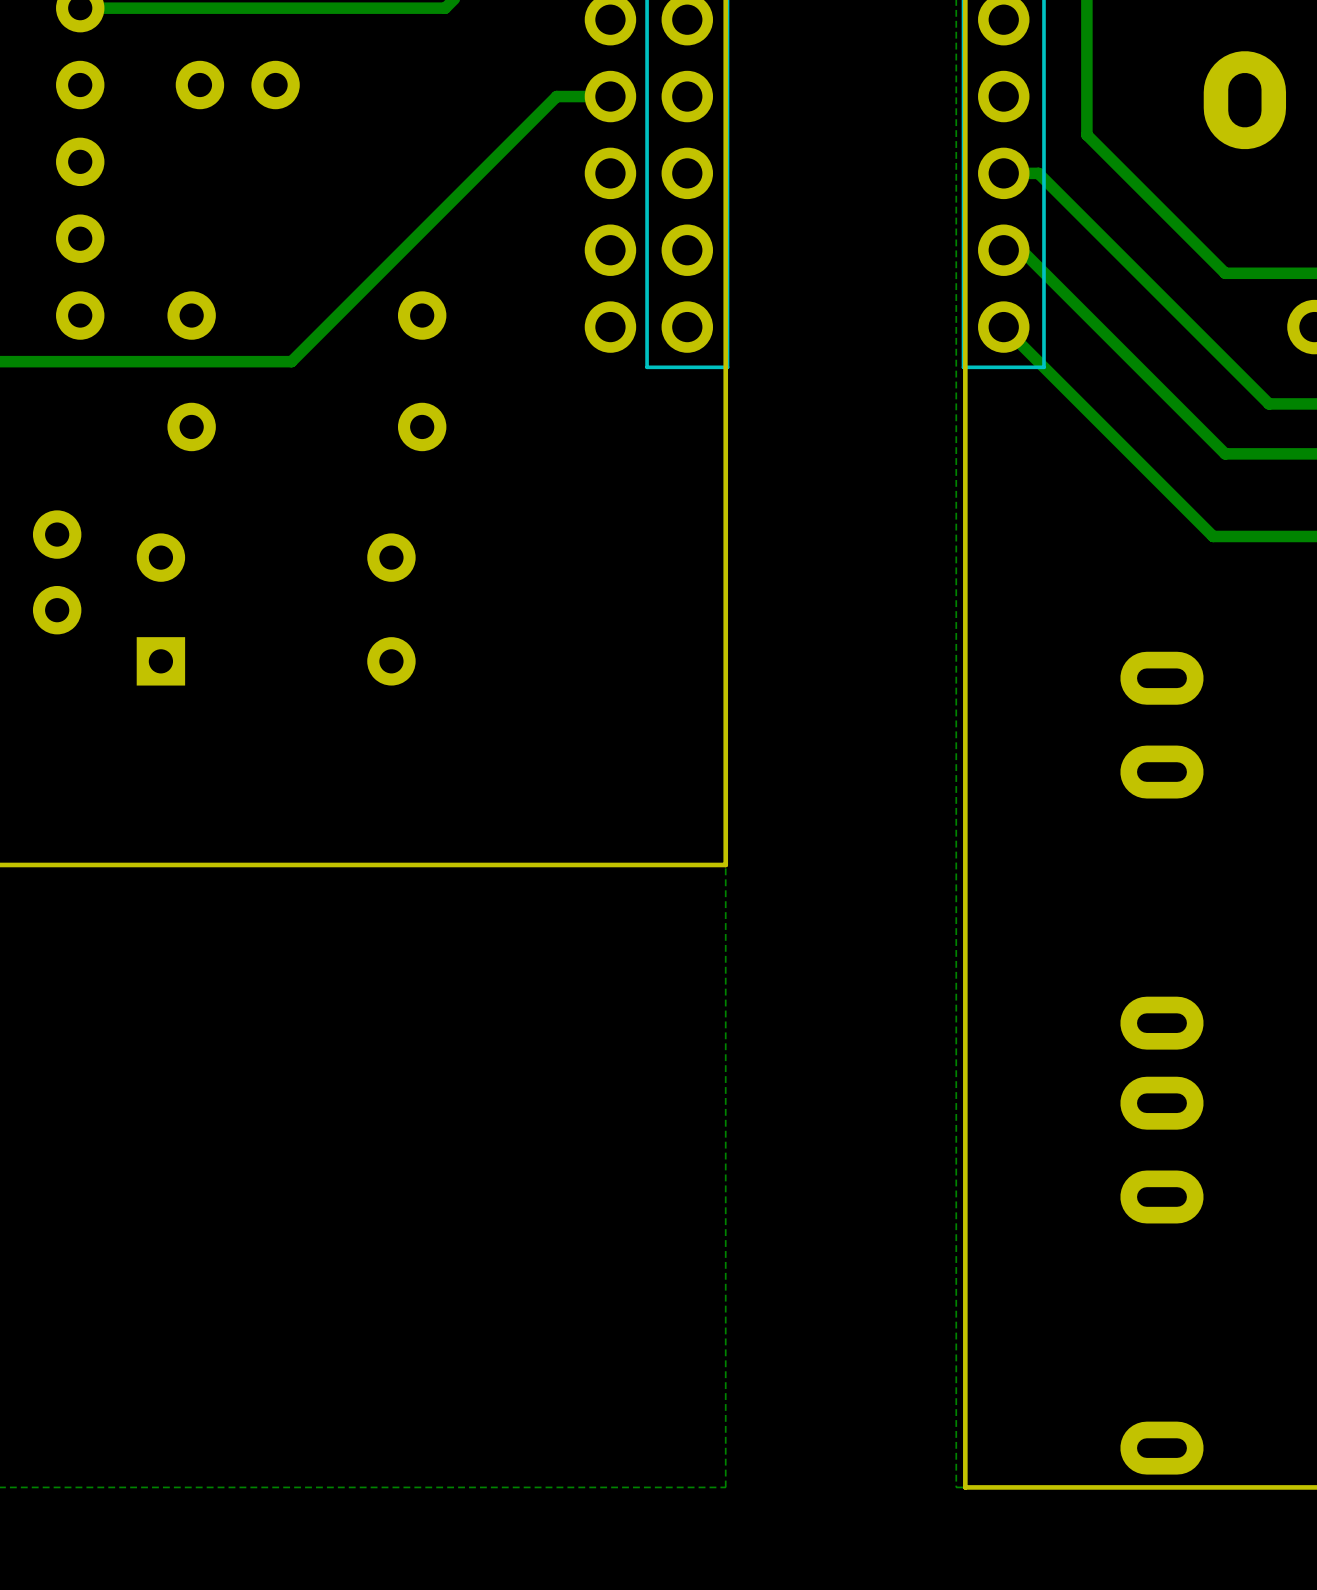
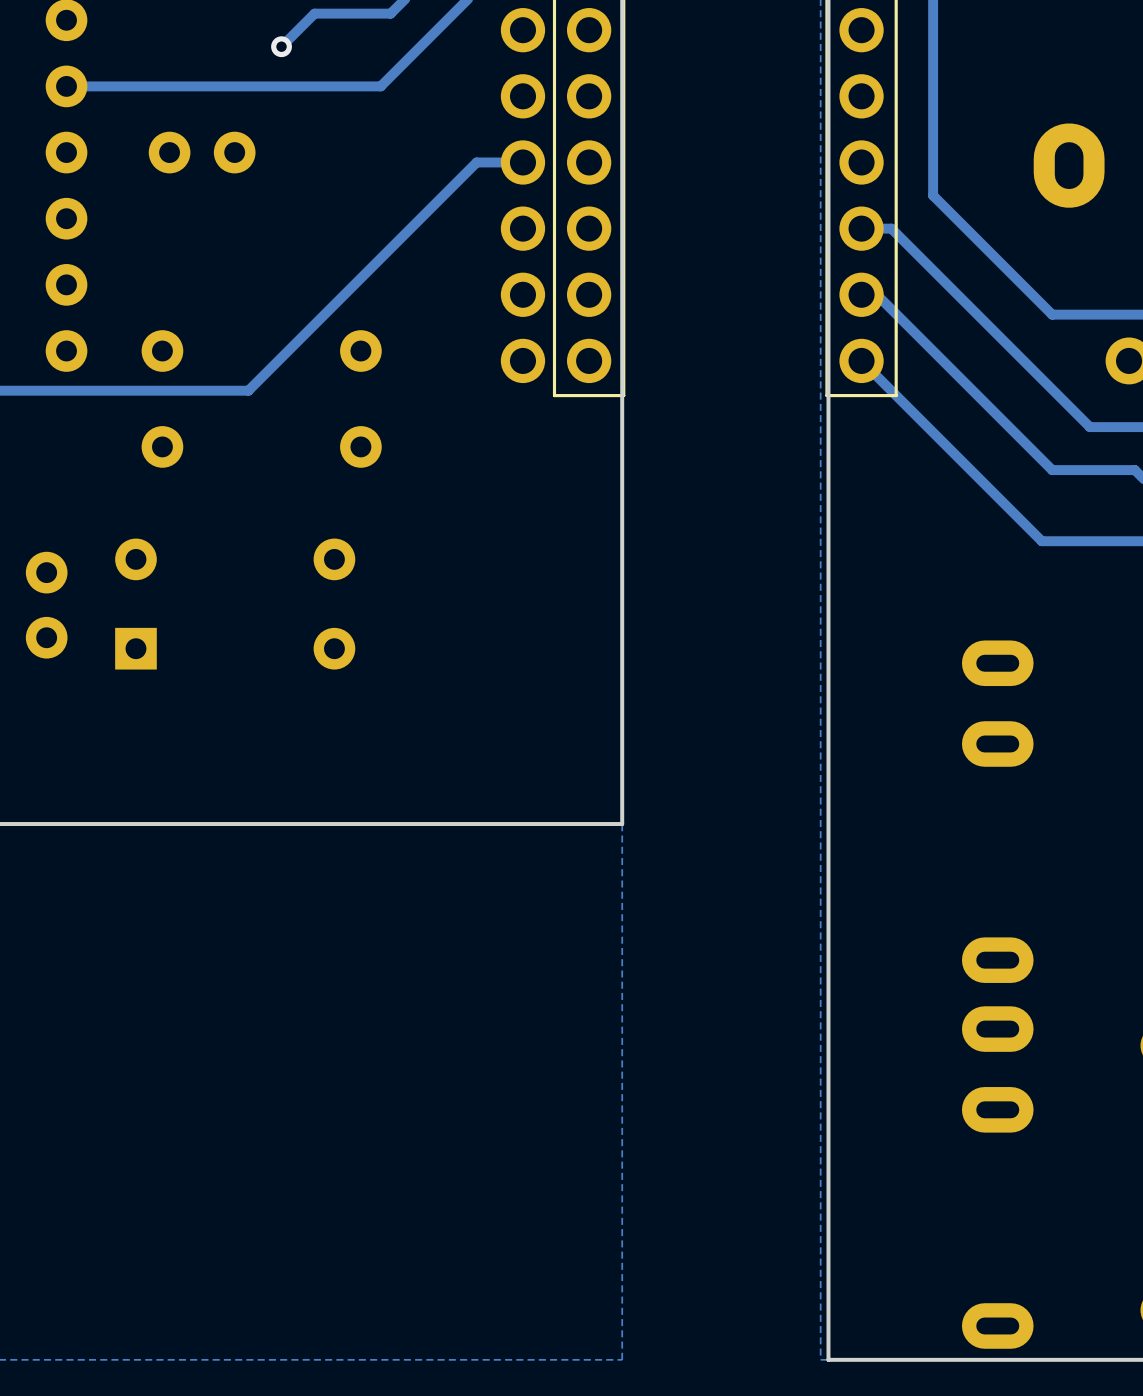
part position: (57, 572) -> (46, 605)

